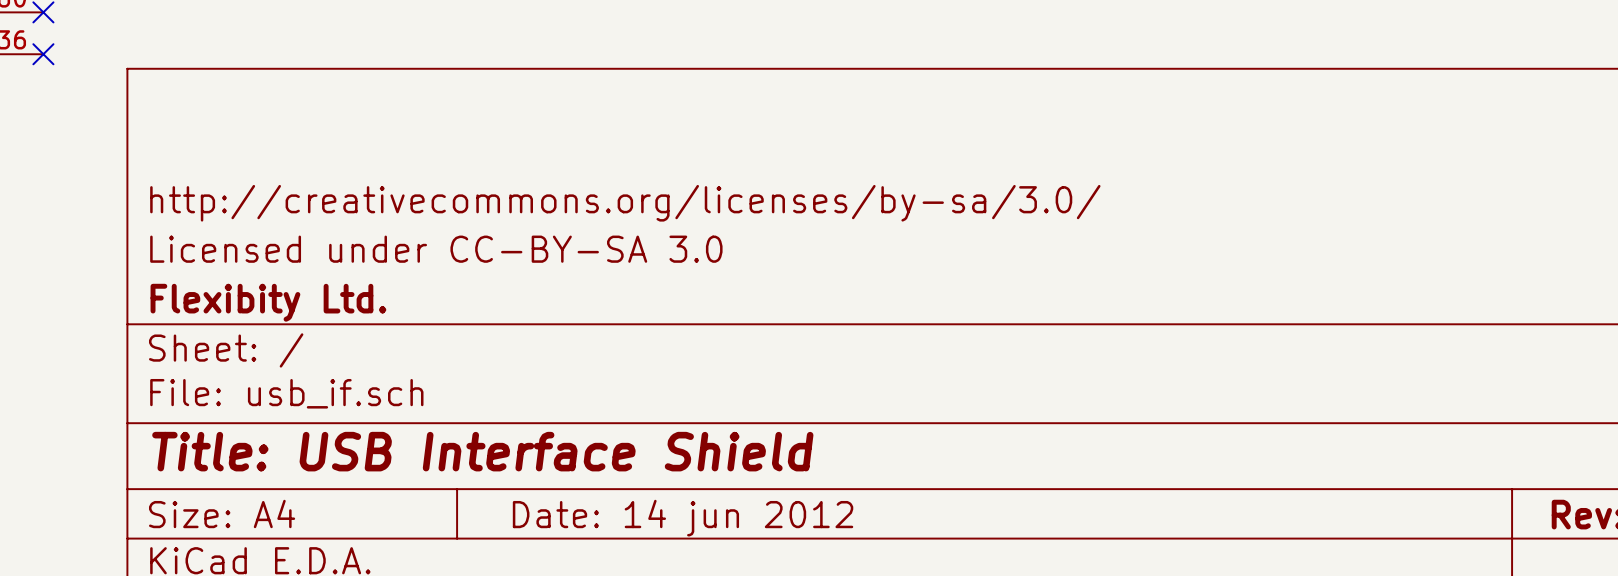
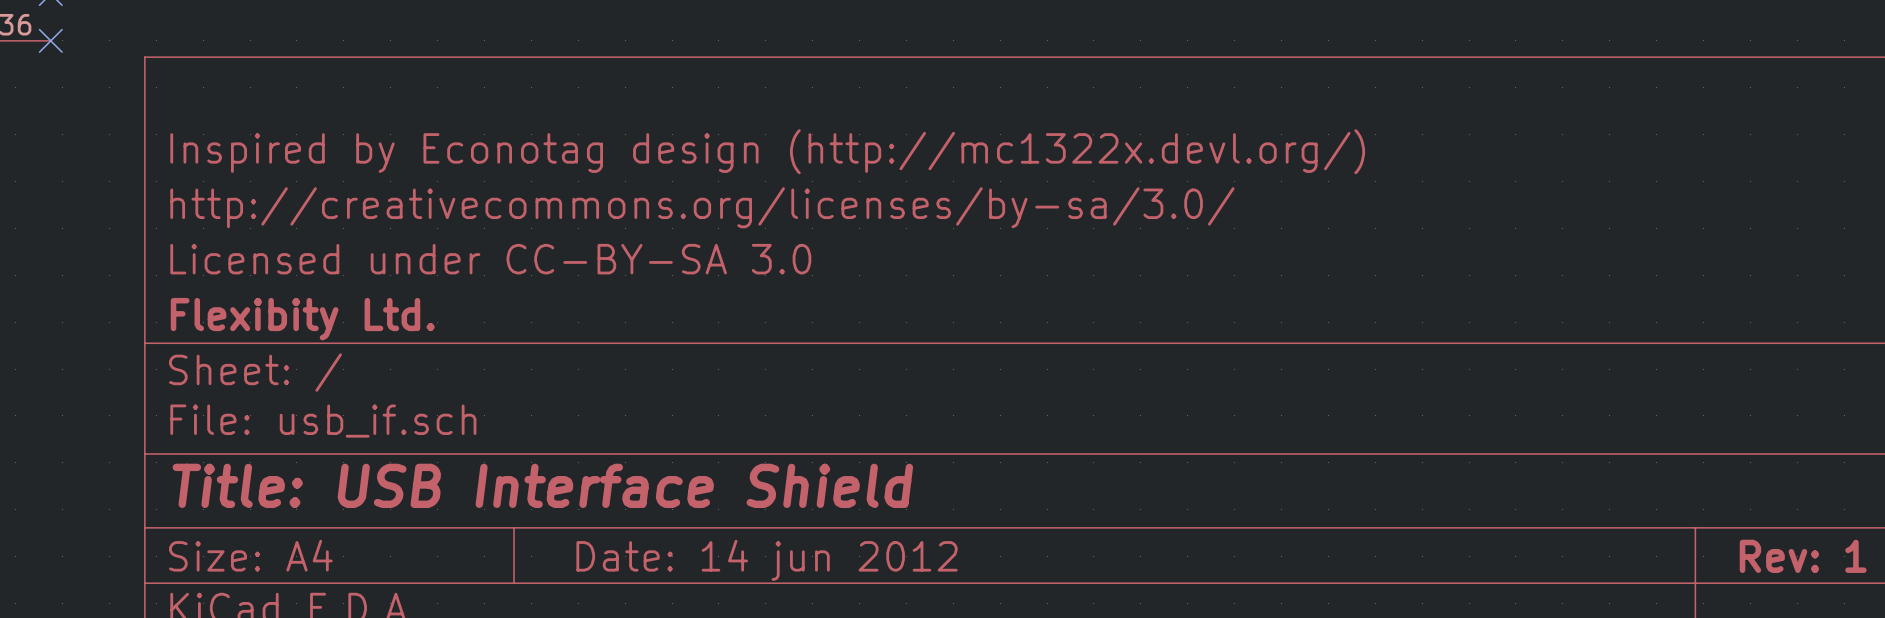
title block: none -> Inspired by Econotag design (http://mc1322x.devl.org/) (767, 151)

